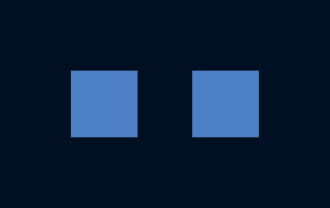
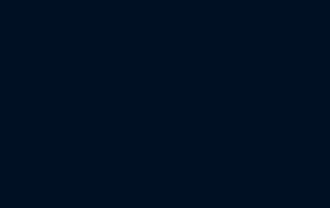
part: (104, 103) -> none
part: (225, 103) -> none

